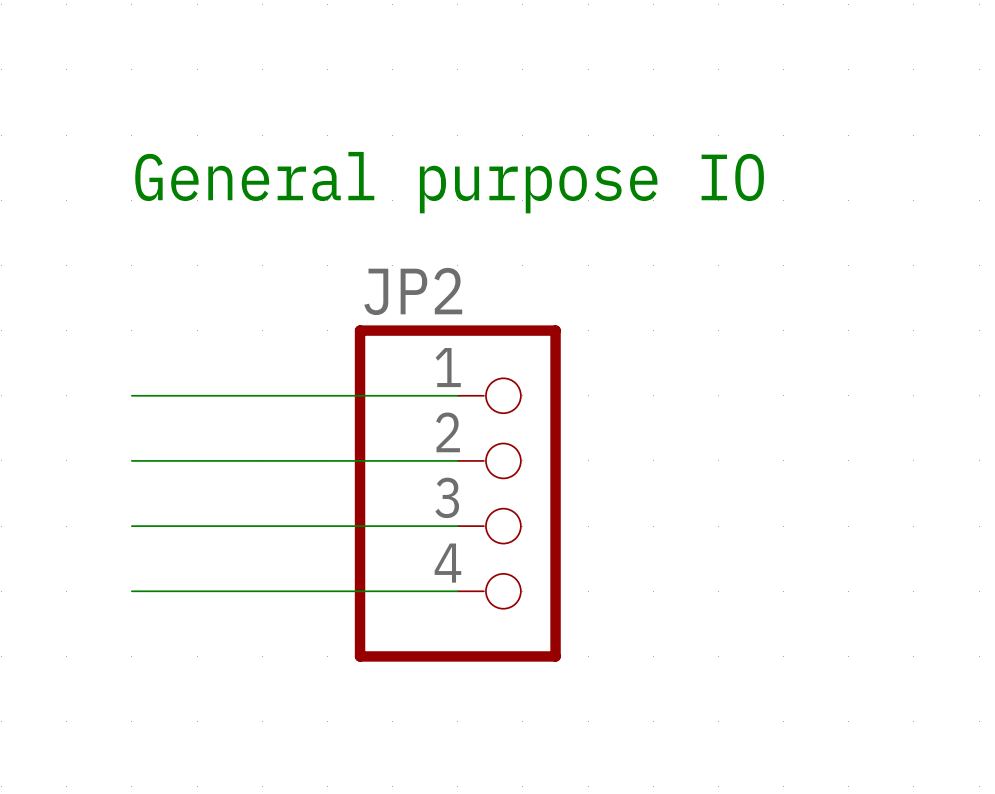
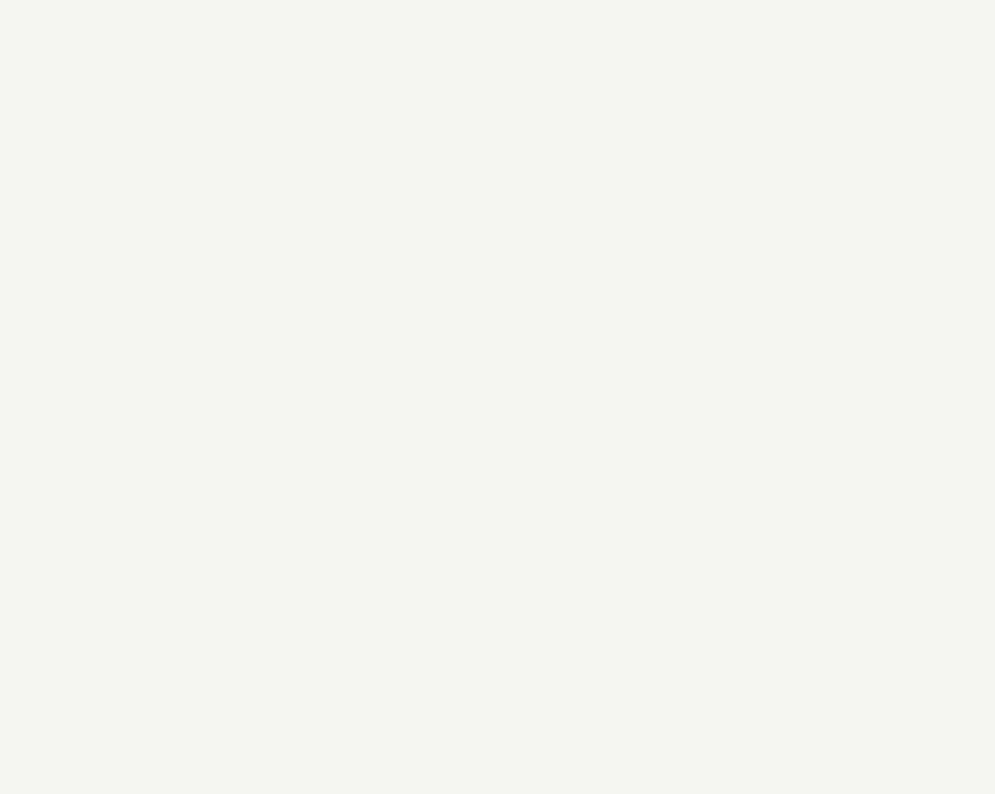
text: General purpose IO (449, 182) -> none
wire: (131, 395) (457, 395) -> none
wire: (131, 460) (457, 460) -> none
JP2: (457, 493) -> none
wire: (131, 526) (457, 526) -> none
wire: (131, 591) (457, 591) -> none

